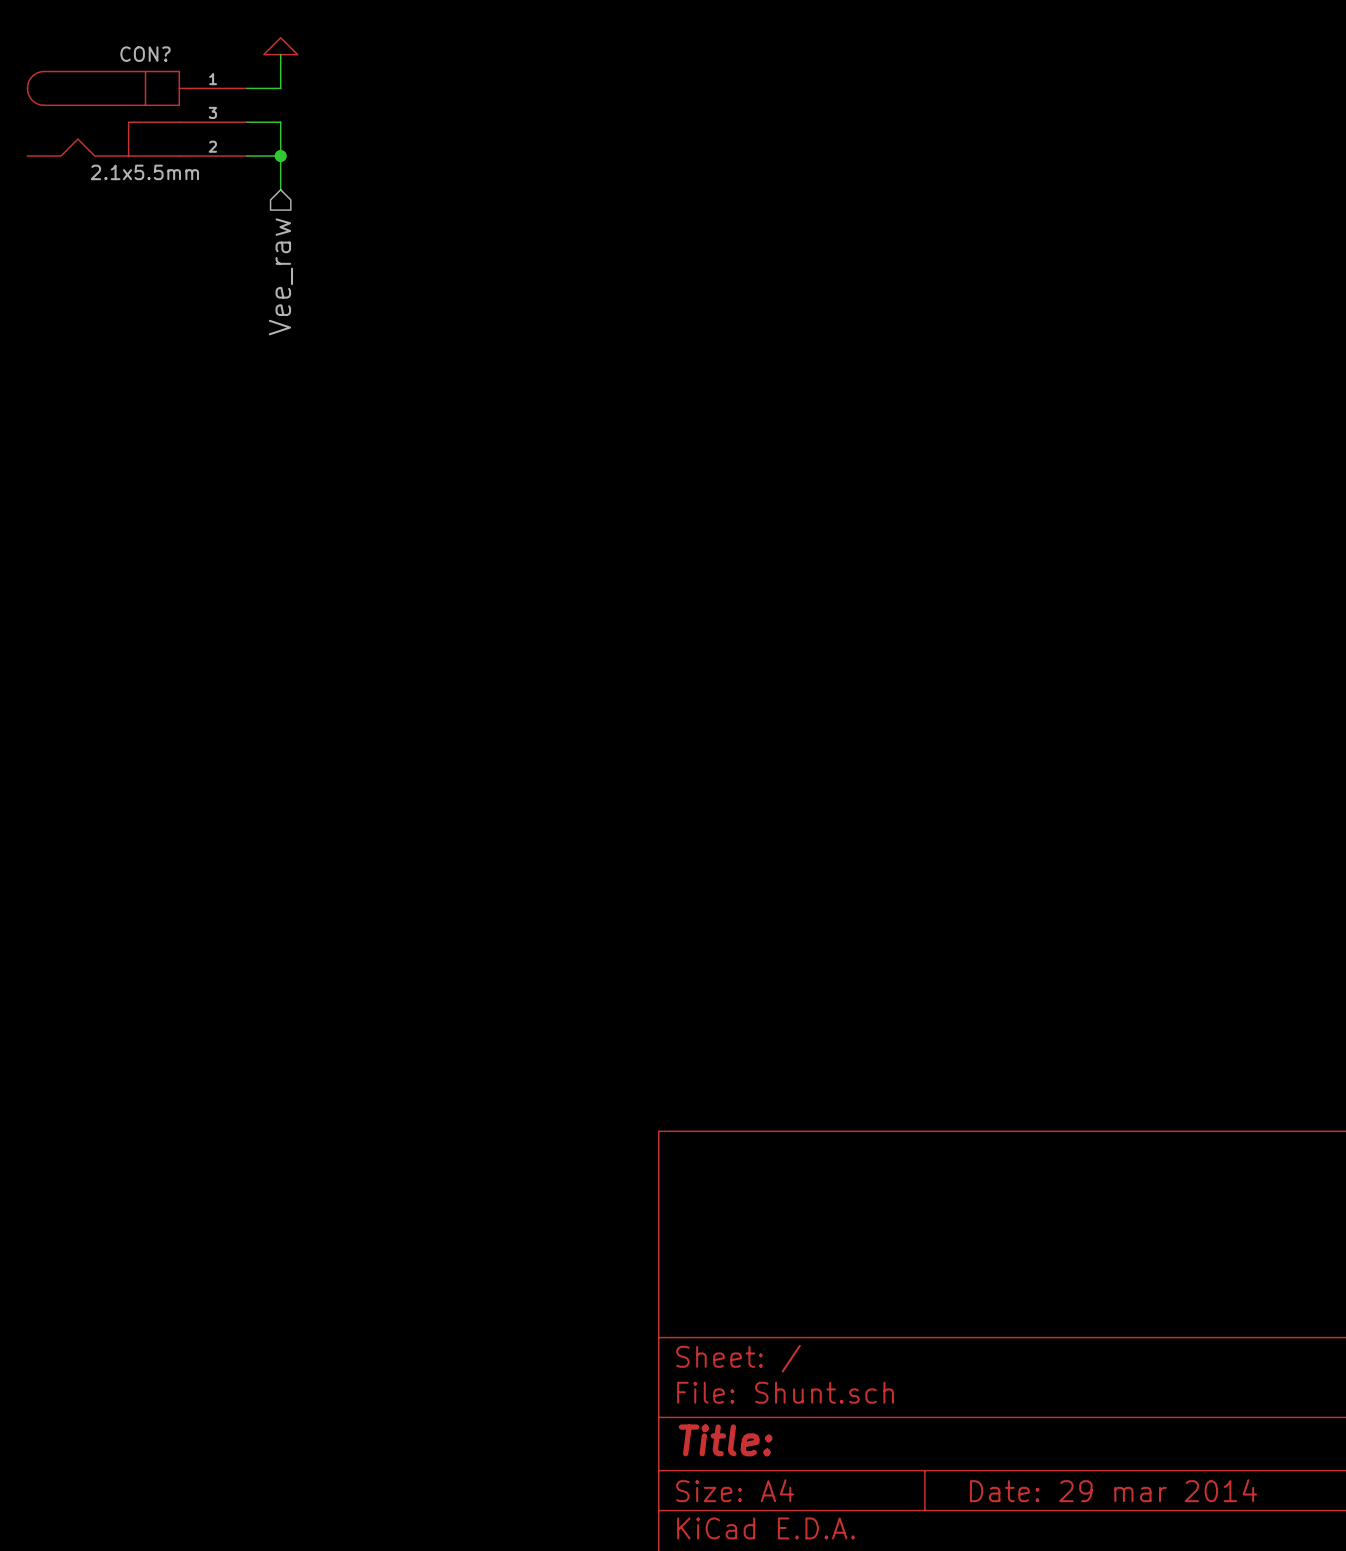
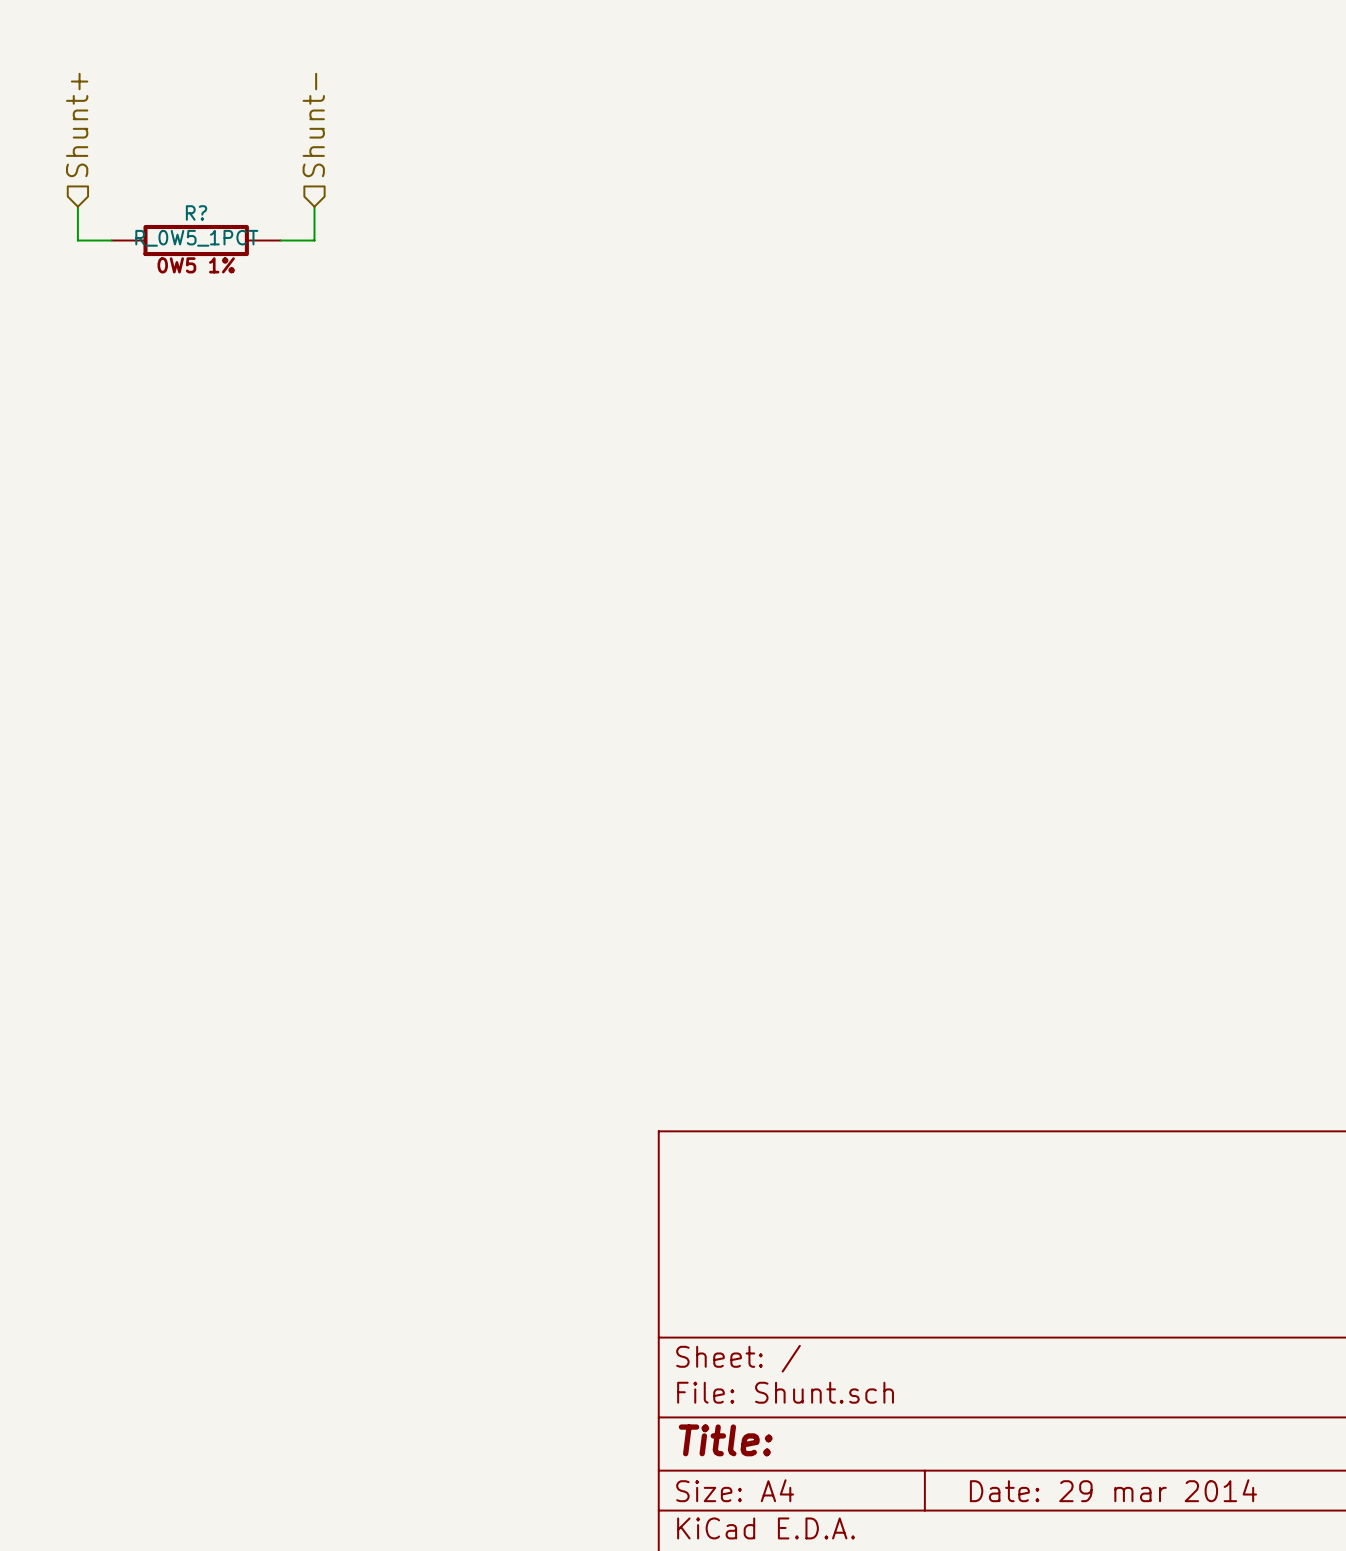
power symbol: (280, 46) -> none
wire: (280, 54) (280, 88) (246, 88) -> (314, 206) (314, 240) (280, 240)
CON?: 2.1x5.5mm (137, 113) -> none
wire: (246, 122) (280, 122) (280, 189) -> none
hierarchical label: none -> Shunt+ (77, 124)
hierarchical label: none -> Shunt- (313, 124)
wire: (246, 156) (280, 156) -> none
junction: (280, 156) -> none
wire: none -> (77, 206) (77, 240) (111, 240)
R?: none -> R_0W5_1PCT (196, 240)
hierarchical label: Vee_raw (280, 276) -> none

